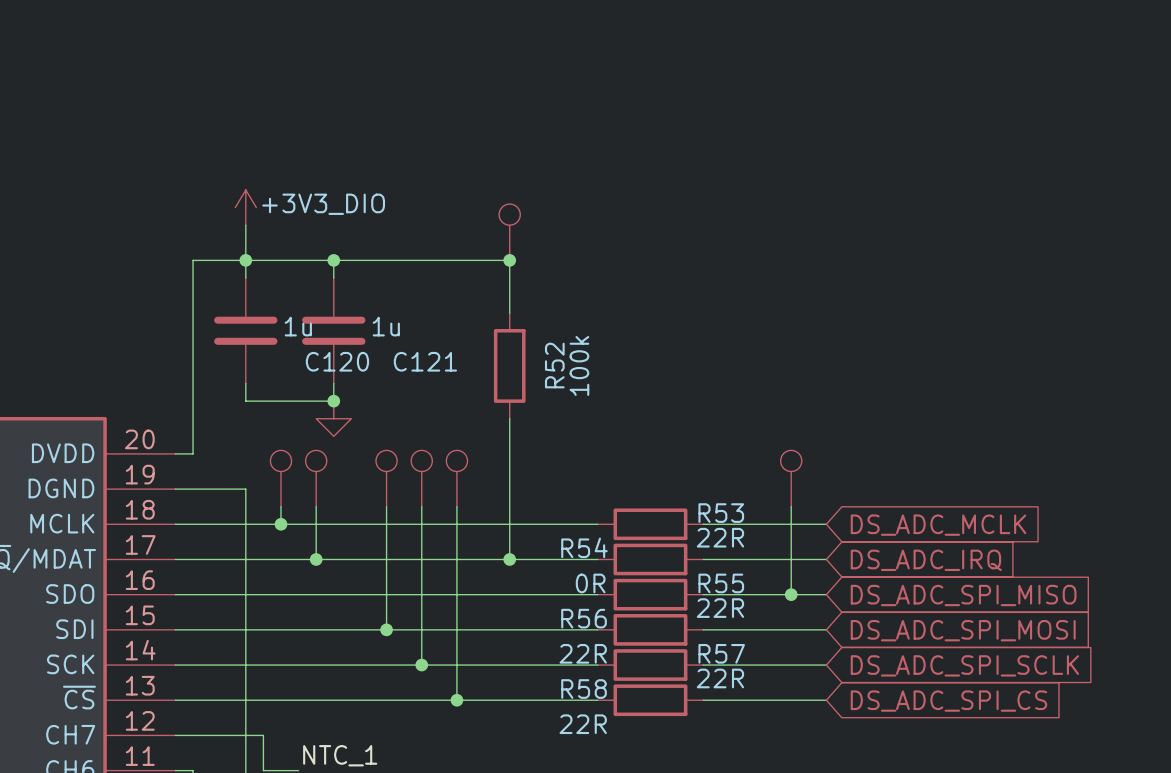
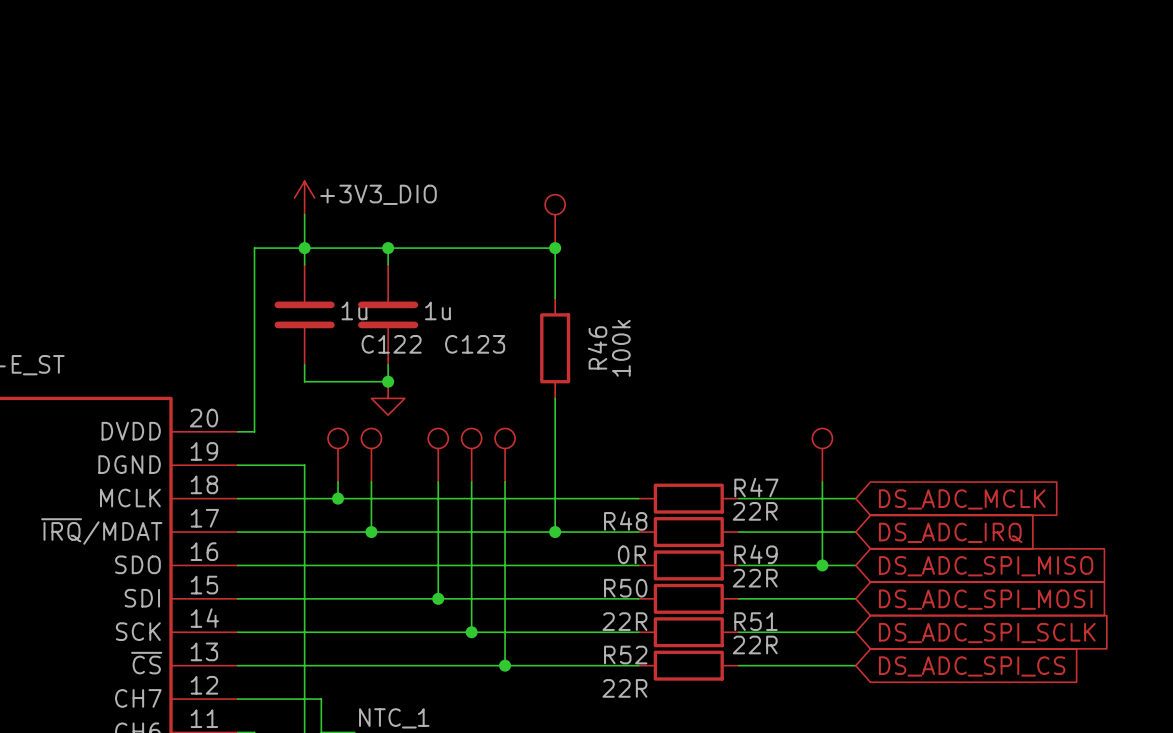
C120 name: C120 (337, 361) -> C122 (391, 344)
C121 name: C121 (425, 361) -> C123 (475, 344)
R52 name: R52 (554, 365) -> R46 (597, 347)
R53 name: R53 (721, 513) -> R47 (756, 487)
R54 name: R54 (584, 547) -> R48 (625, 520)
R55 name: R55 (721, 583) -> R49 (755, 554)
R56 name: R56 (584, 618) -> R50 (625, 588)
R57 name: R57 (721, 653) -> R51 (755, 621)
R58 name: R58 (584, 689) -> R52 (625, 655)

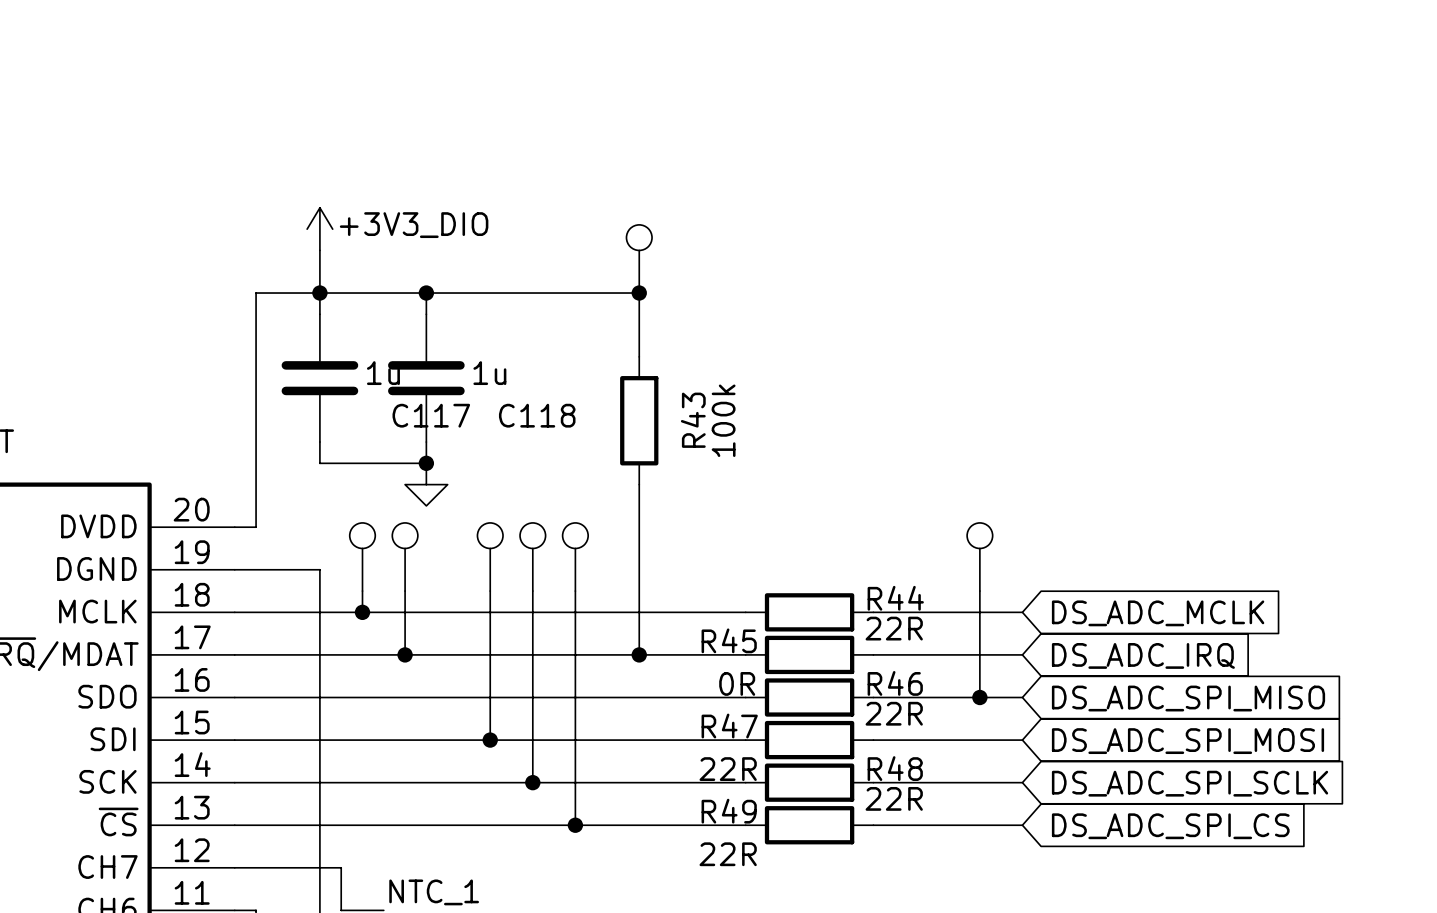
C122 name: C122 (391, 344) -> C117 (431, 415)
C123 name: C123 (475, 344) -> C118 (537, 415)
R46 name: R46 (597, 347) -> R43 (693, 420)
R47 name: R47 (756, 487) -> R44 (895, 598)
R48 name: R48 (625, 520) -> R45 (729, 640)
R49 name: R49 (755, 554) -> R46 (895, 683)
R50 name: R50 (625, 588) -> R47 (729, 726)
R51 name: R51 (755, 621) -> R48 (895, 768)
R52 name: R52 (625, 655) -> R49 (729, 811)

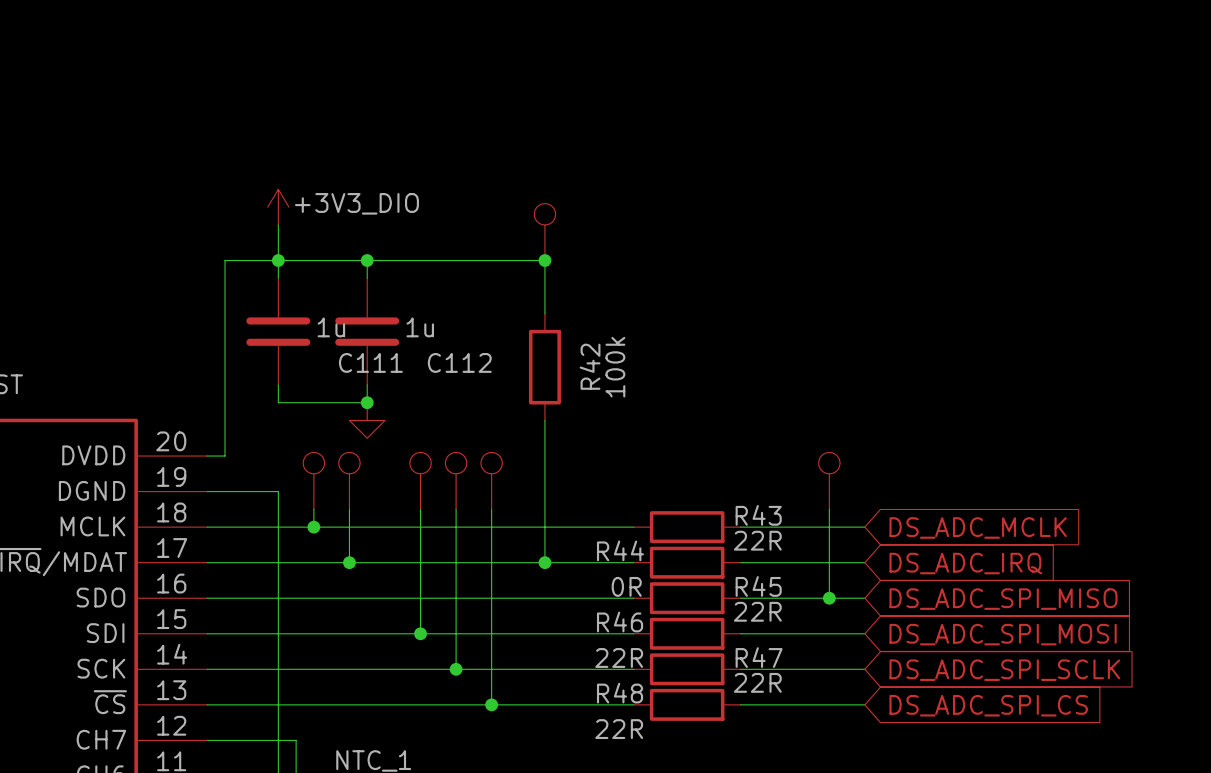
C117 name: C117 (431, 415) -> C111 (370, 362)
C118 name: C118 (537, 415) -> C112 (459, 362)
R43 name: R43 (693, 420) -> R42 (590, 366)
R44 name: R44 (895, 598) -> R43 (758, 515)
R45 name: R45 (729, 640) -> R44 (620, 550)
R46 name: R46 (895, 683) -> R45 (758, 586)
R47 name: R47 (729, 726) -> R46 (620, 622)
R48 name: R48 (895, 768) -> R47 (759, 657)
R49 name: R49 (729, 811) -> R48 (620, 693)

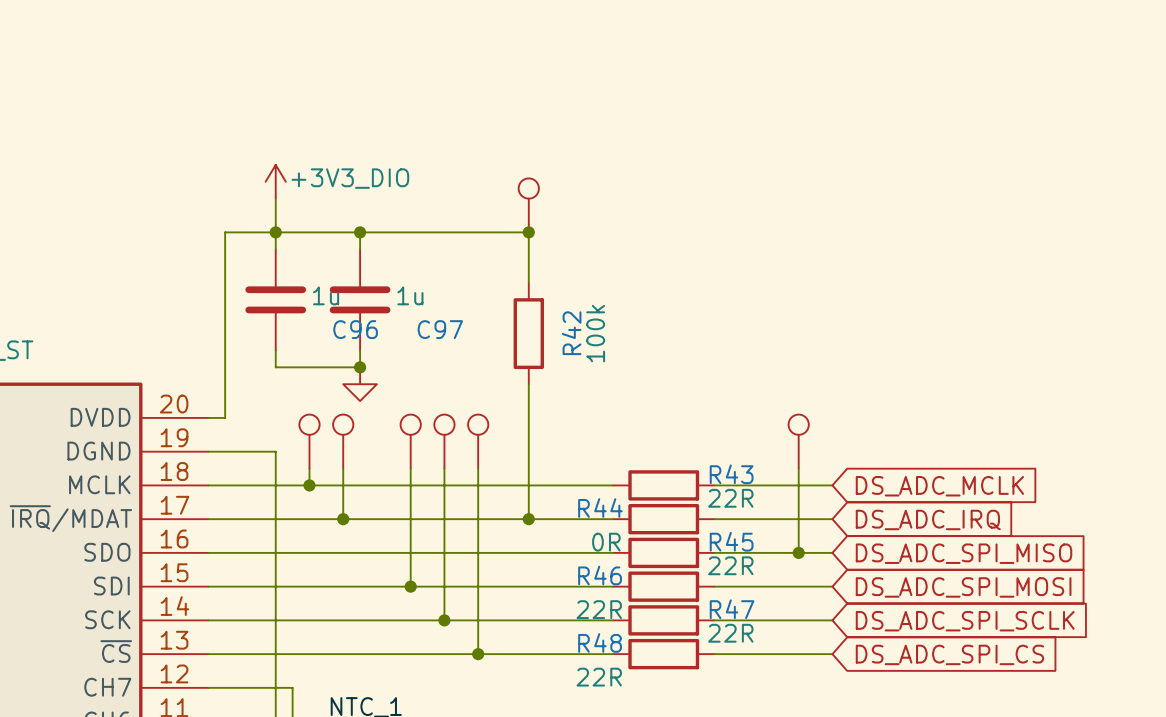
C111 name: C111 (370, 362) -> C96 (355, 329)
C112 name: C112 (459, 362) -> C97 (440, 329)

